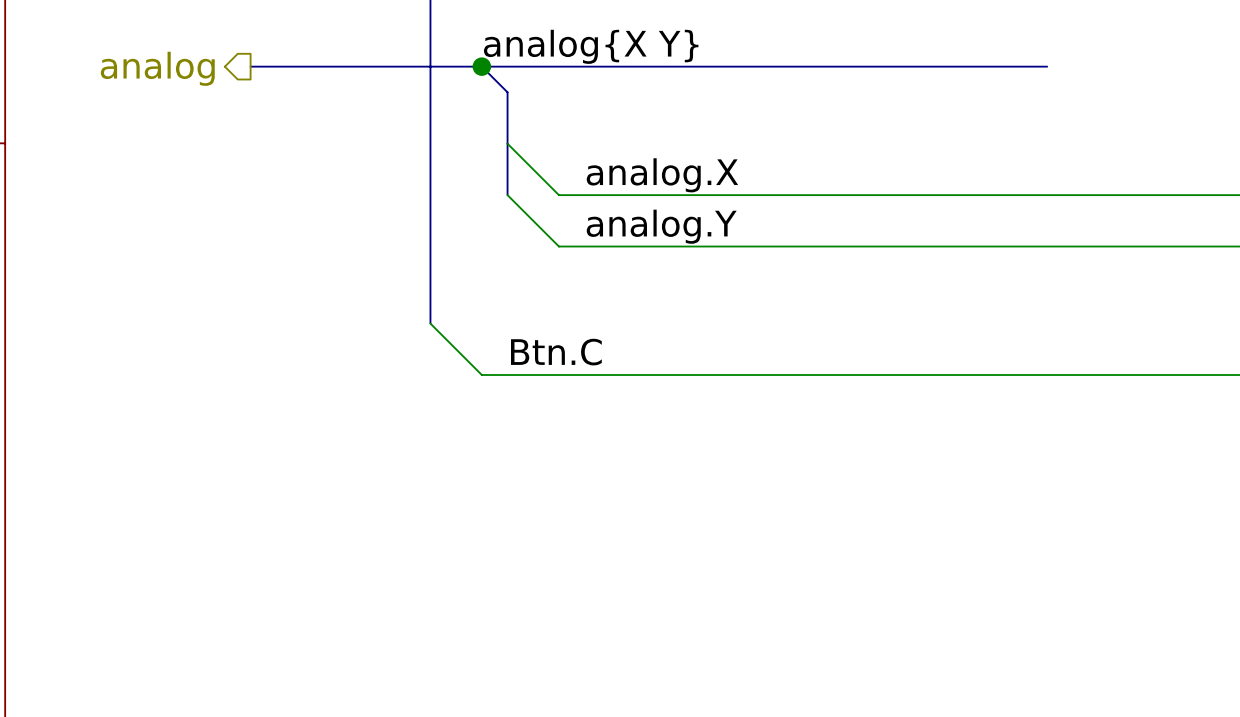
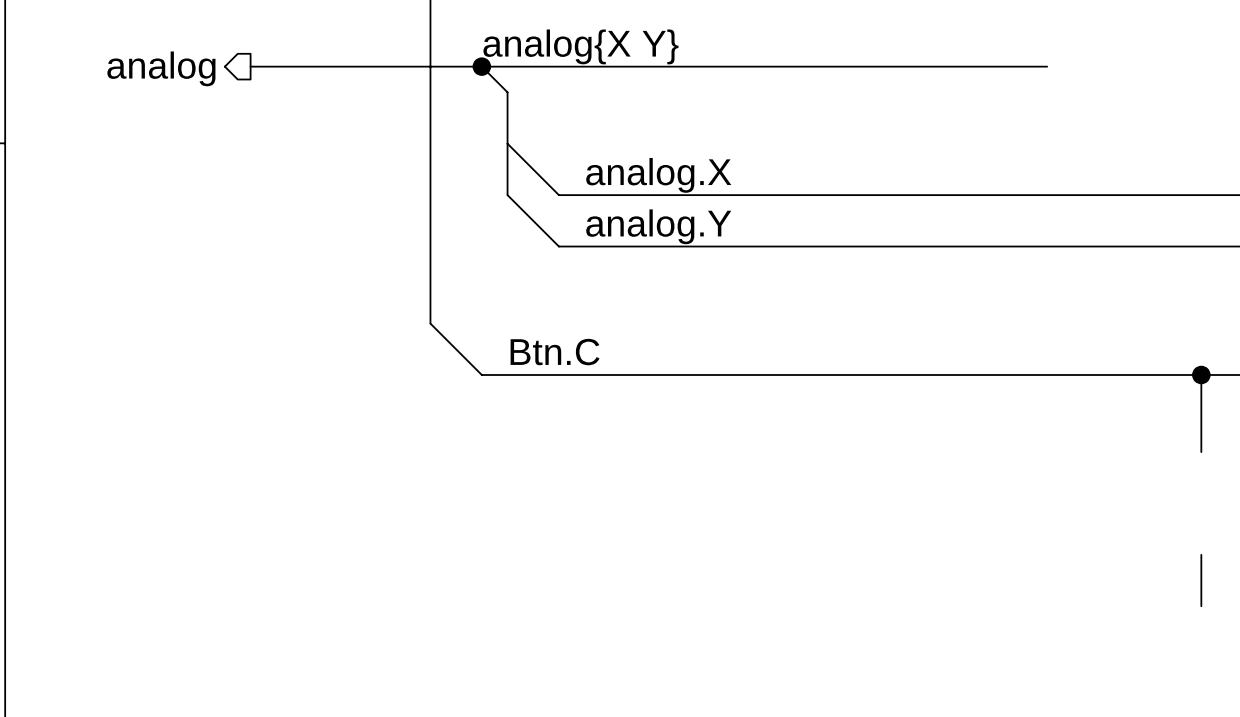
wire: none -> (1201, 374) (1201, 452)
junction: none -> (1201, 374)
wire: none -> (1201, 554) (1201, 606)

